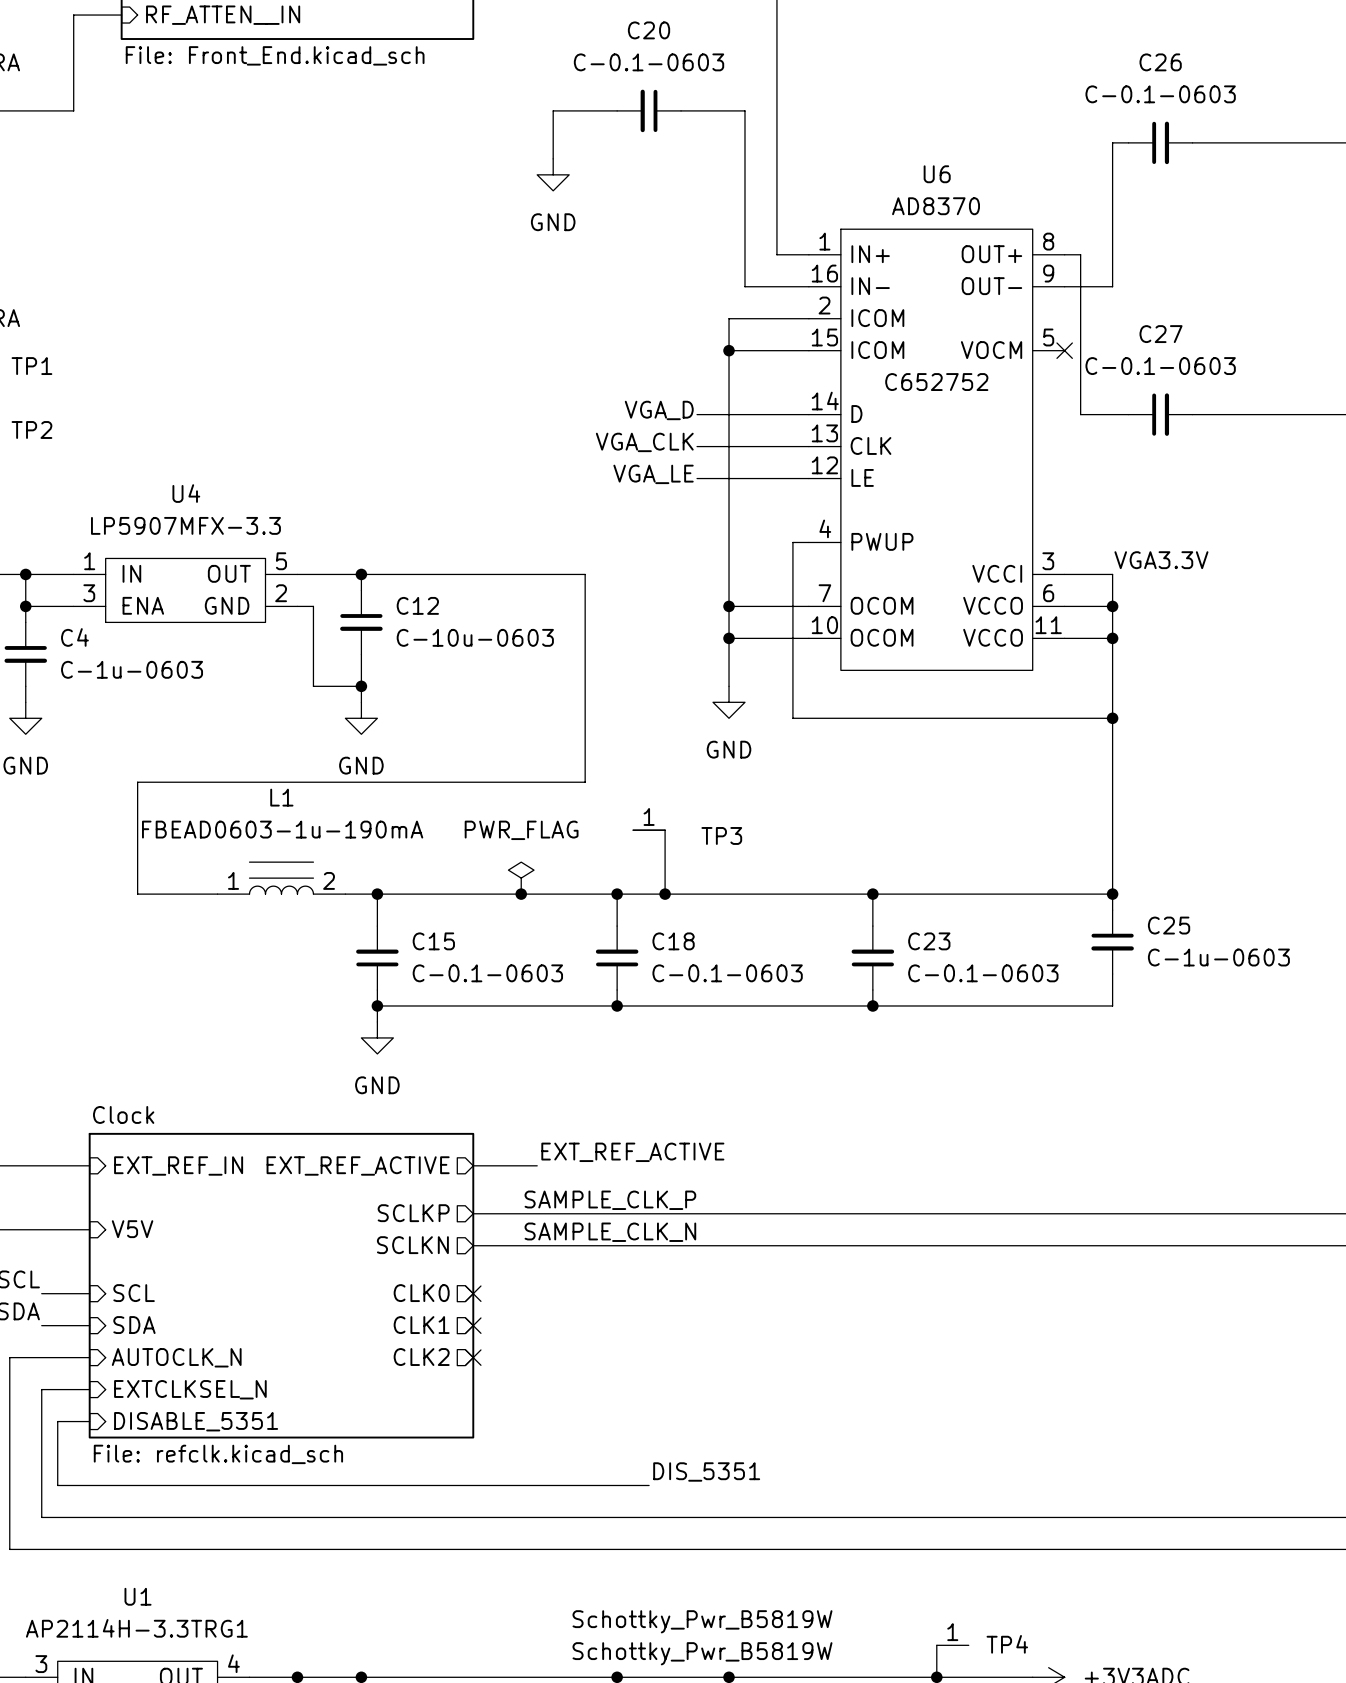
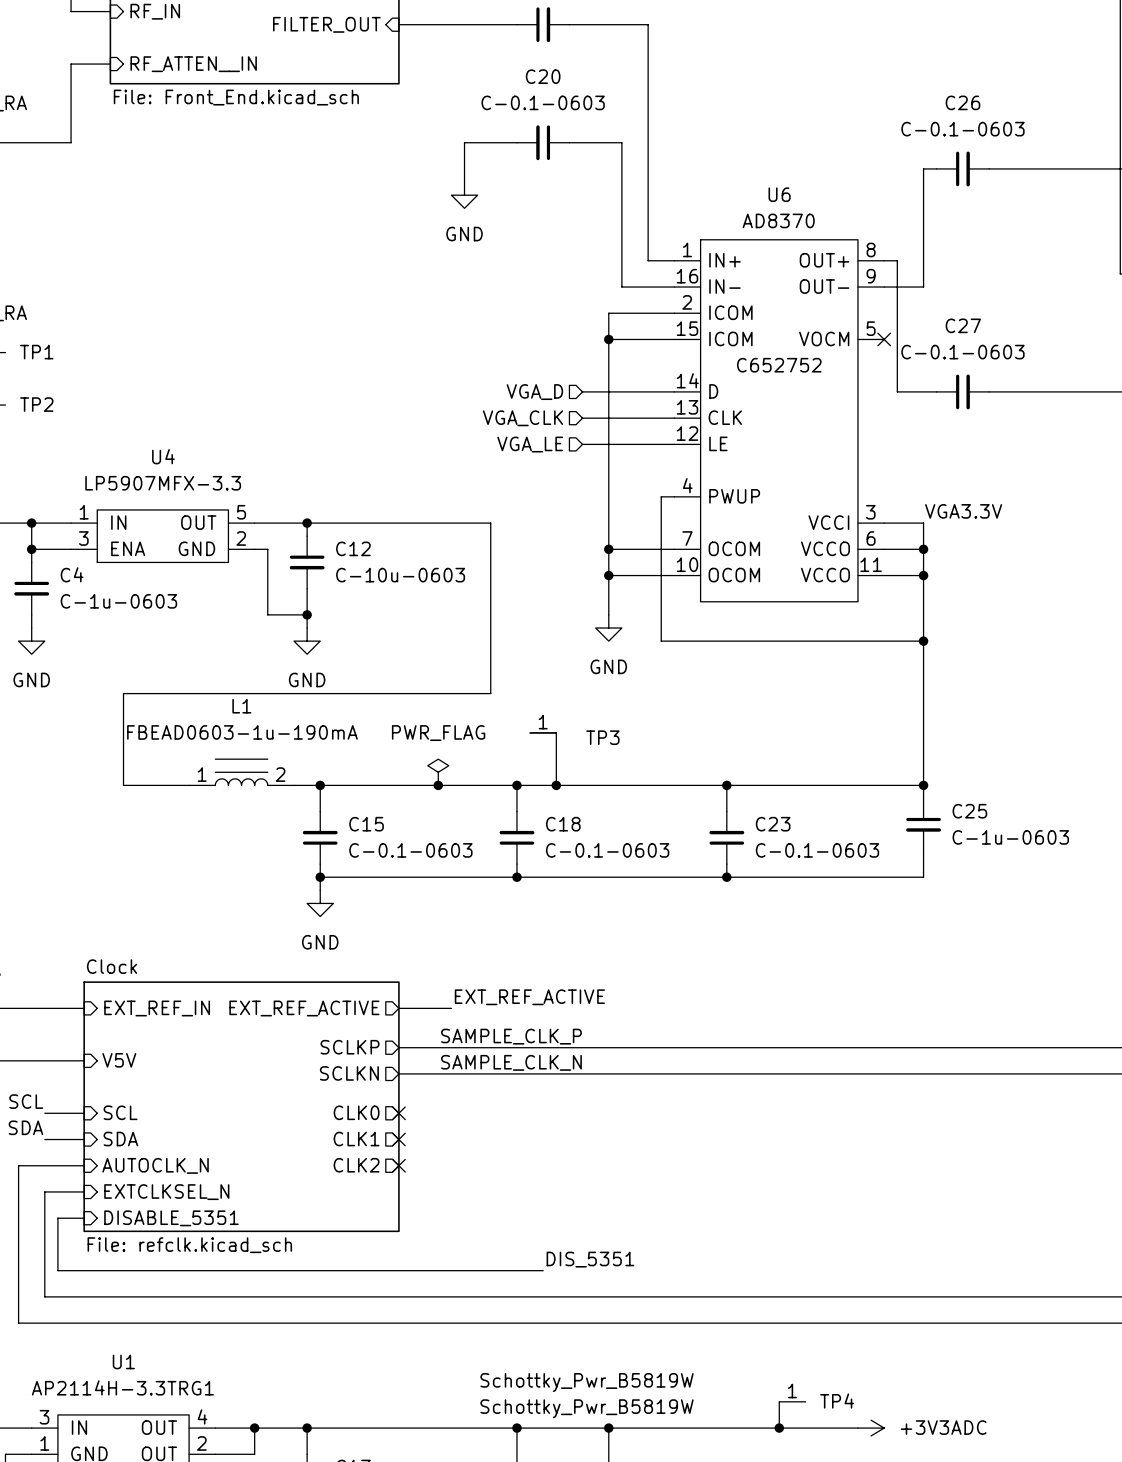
label: VGA_D (659, 410) -> none
hierarchical label: none -> VGA_D (534, 392)
label: VGA_CLK (644, 442) -> none
hierarchical label: none -> VGA_CLK (523, 418)
label: VGA_LE (653, 474) -> none
hierarchical label: none -> VGA_LE (530, 444)

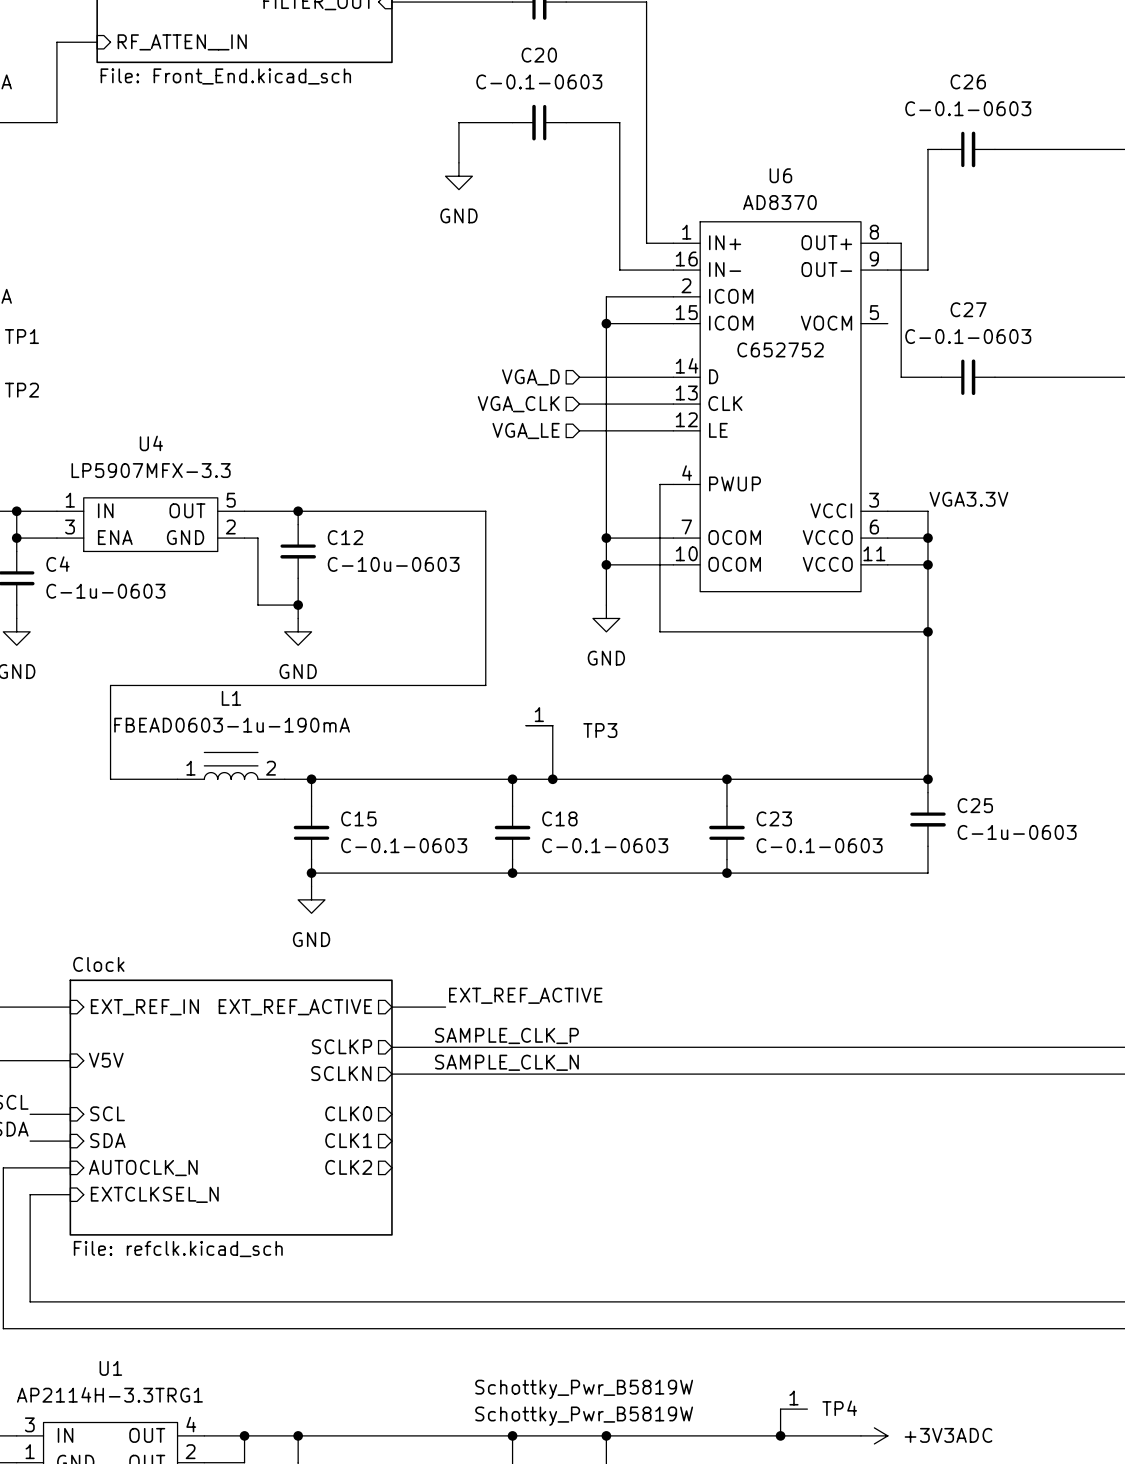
no-connect mark: (884, 339) -> none
power symbol: PWR_FLAG (438, 772) -> none
junction: (438, 785) -> none
no-connect mark: (398, 1113) -> none
no-connect mark: (398, 1139) -> none
no-connect mark: (398, 1165) -> none
wire: (84, 1218) (57, 1218) (57, 1270) (543, 1270) -> none
sheet pin: DISABLE_5351 (171, 1218) -> none
label: DIS_5351 (590, 1259) -> none

